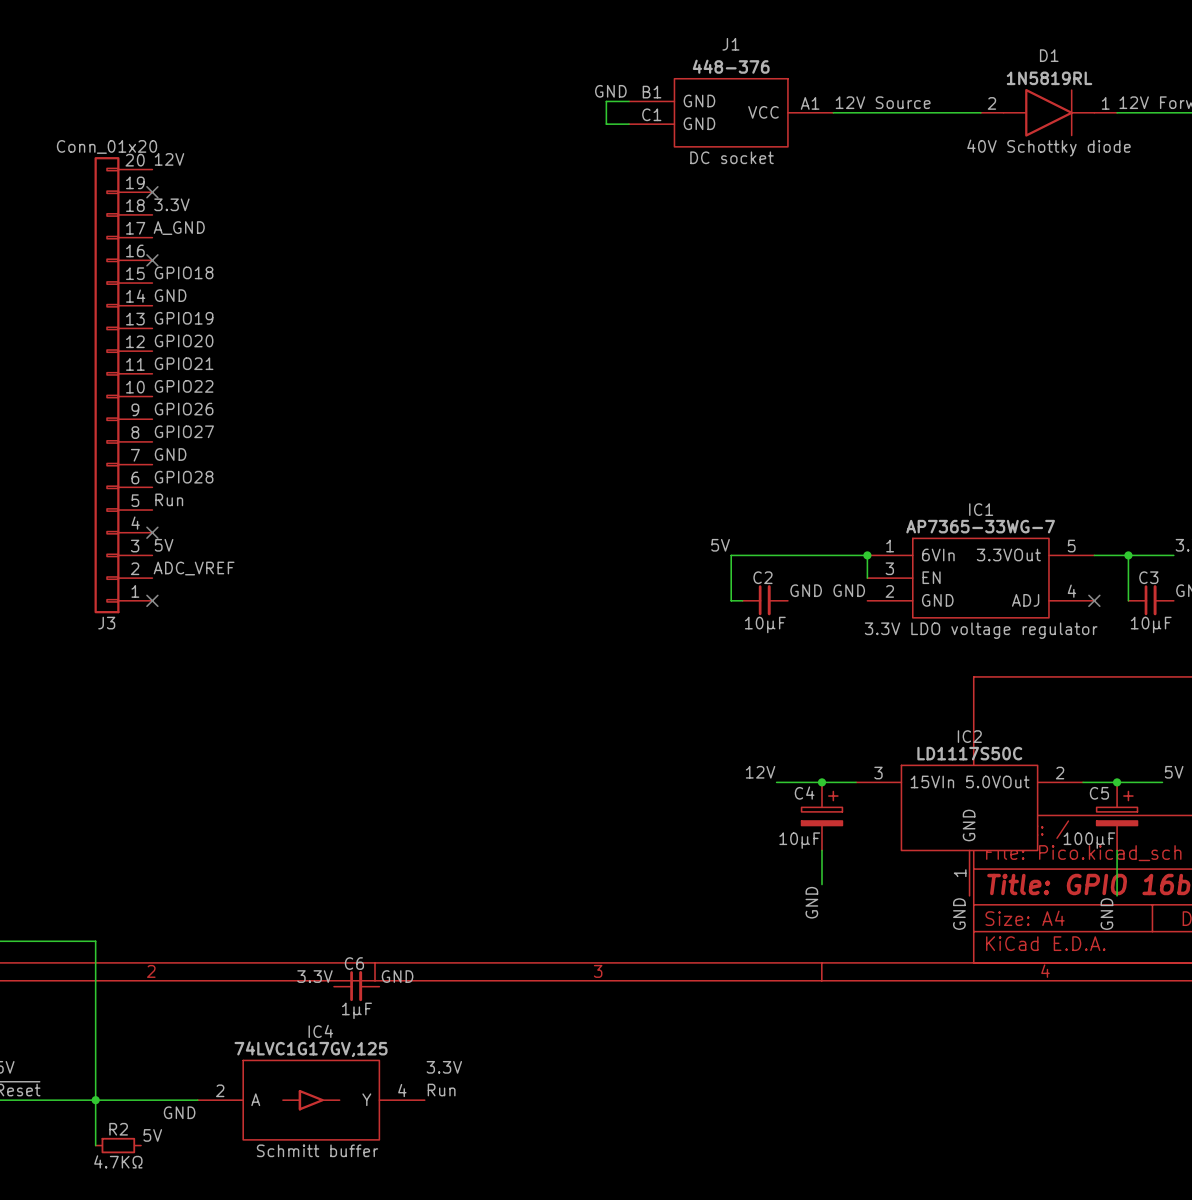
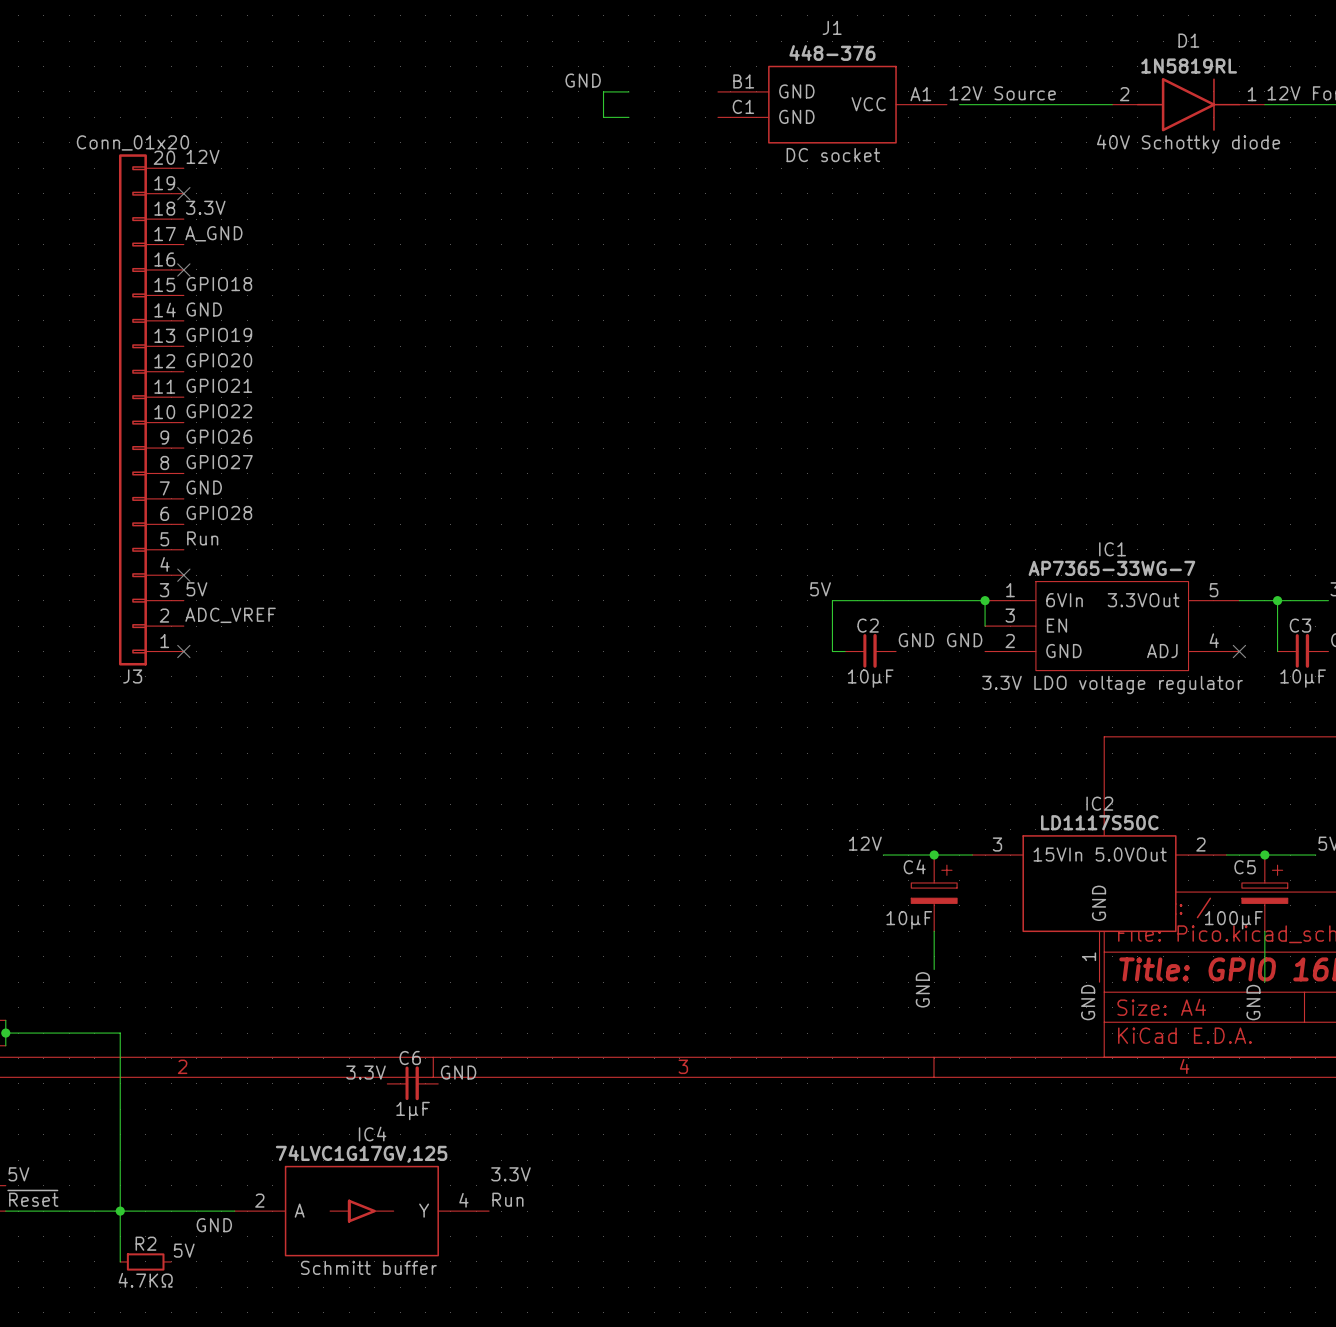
label position: GND (610, 91) -> GND (583, 80)
wire: (629, 101) (606, 101) (606, 124) (629, 124) -> (628, 91) (603, 91) (603, 117) (628, 117)
wire: (833, 112) (844, 112) -> none

